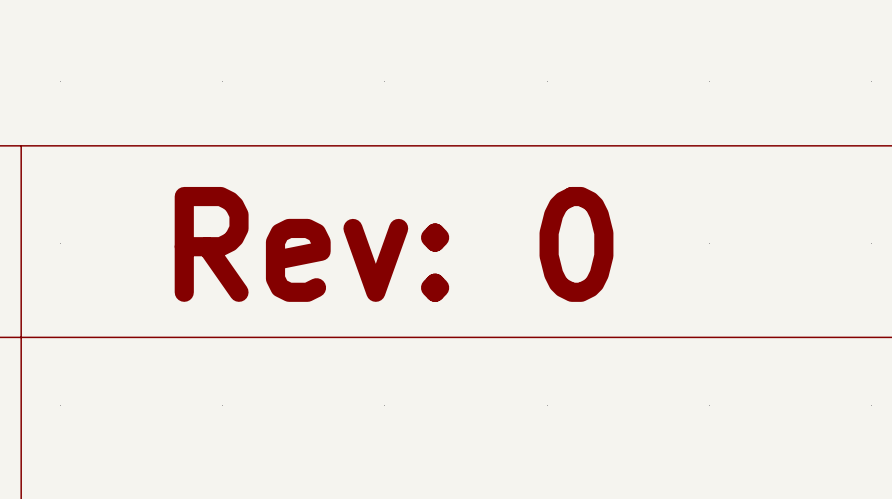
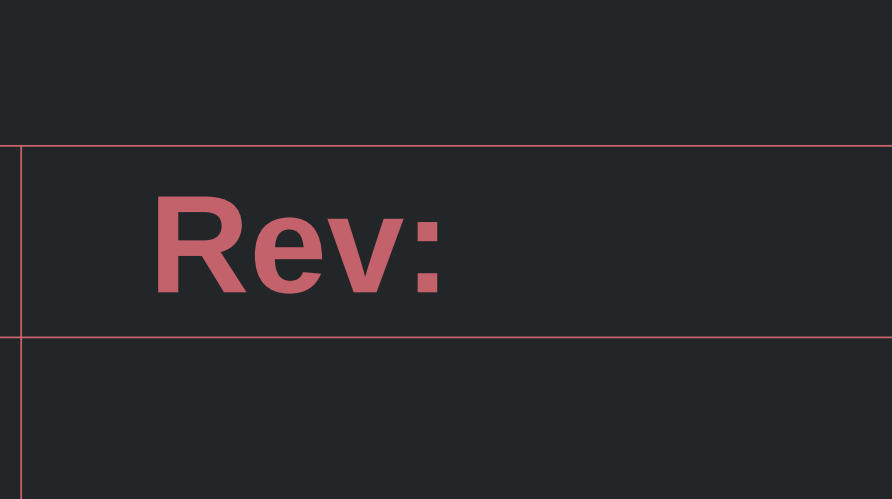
title block: Rev: 0 (394, 244) -> Rev: (297, 245)

